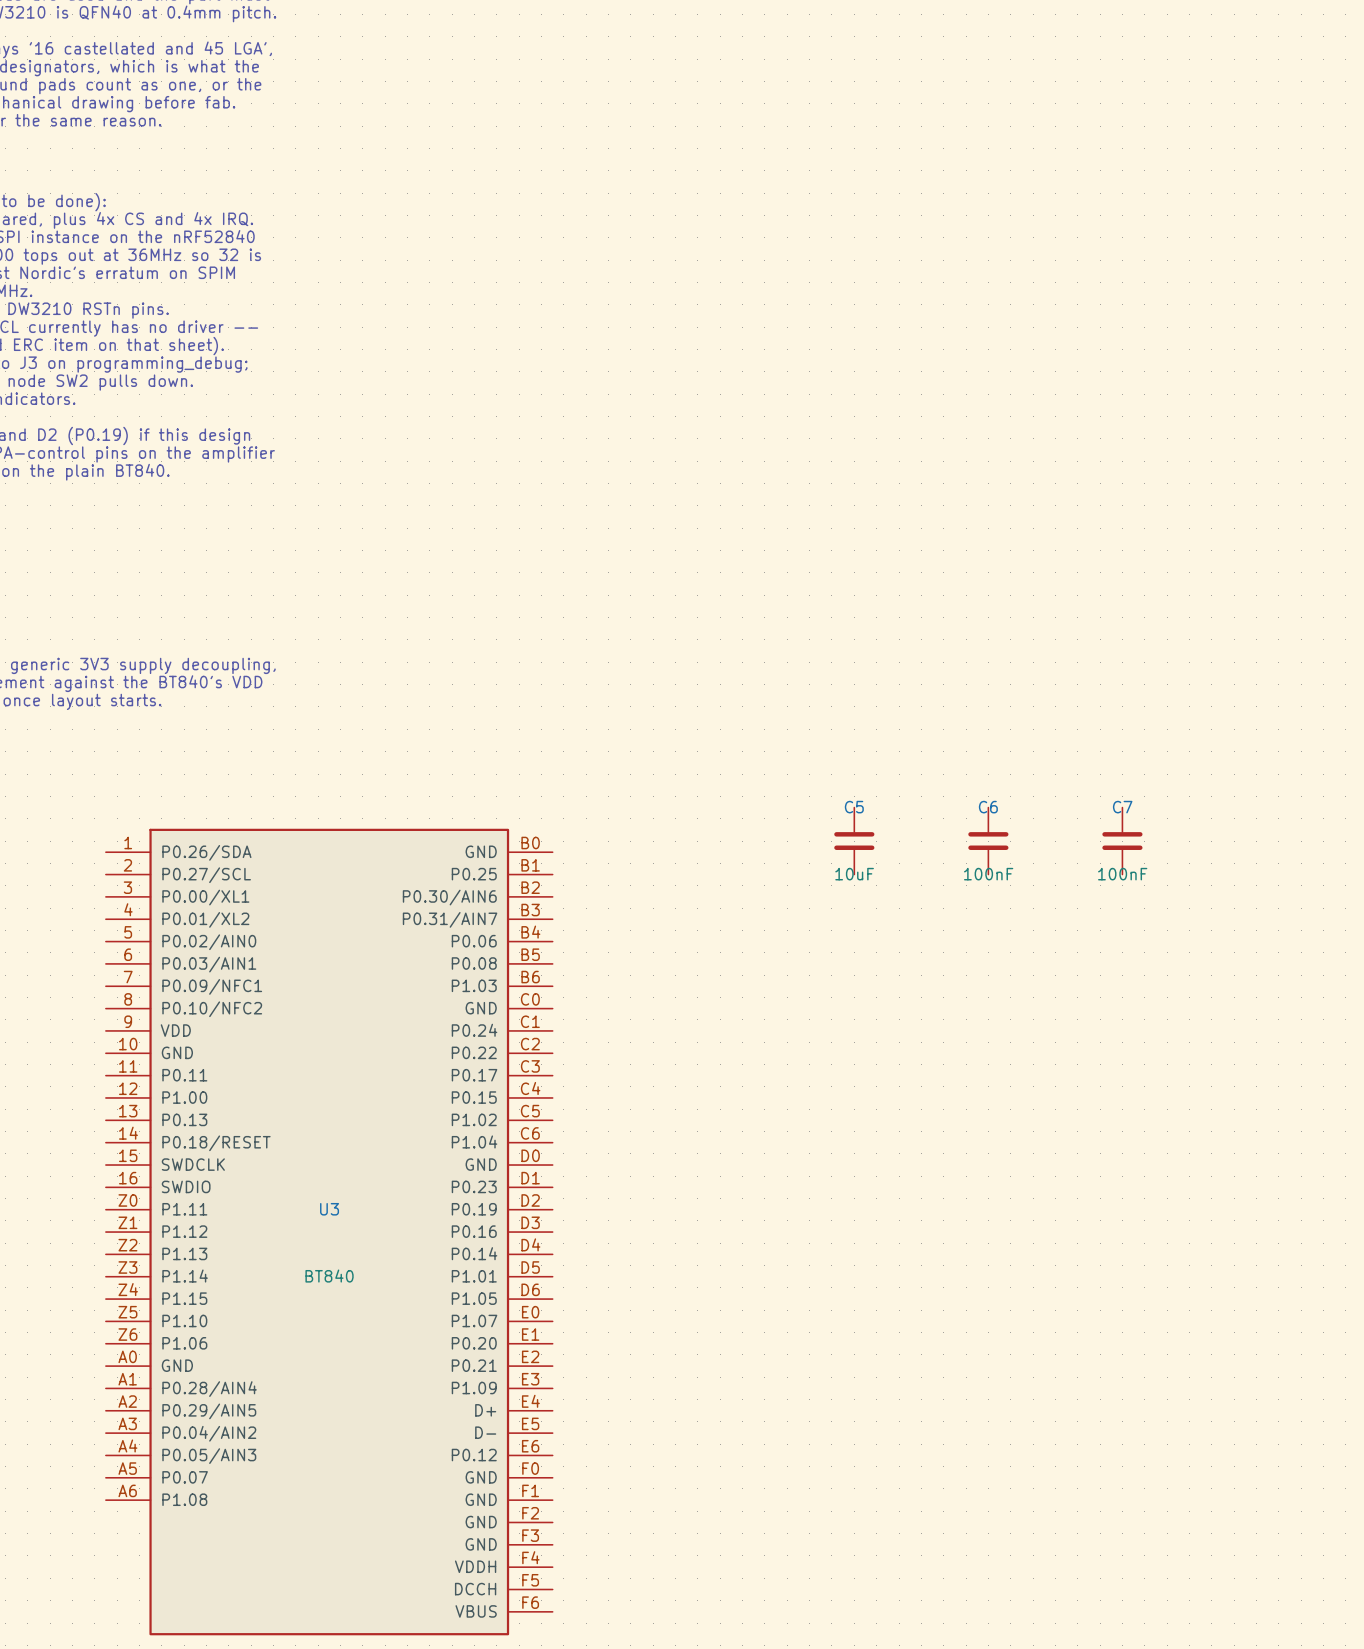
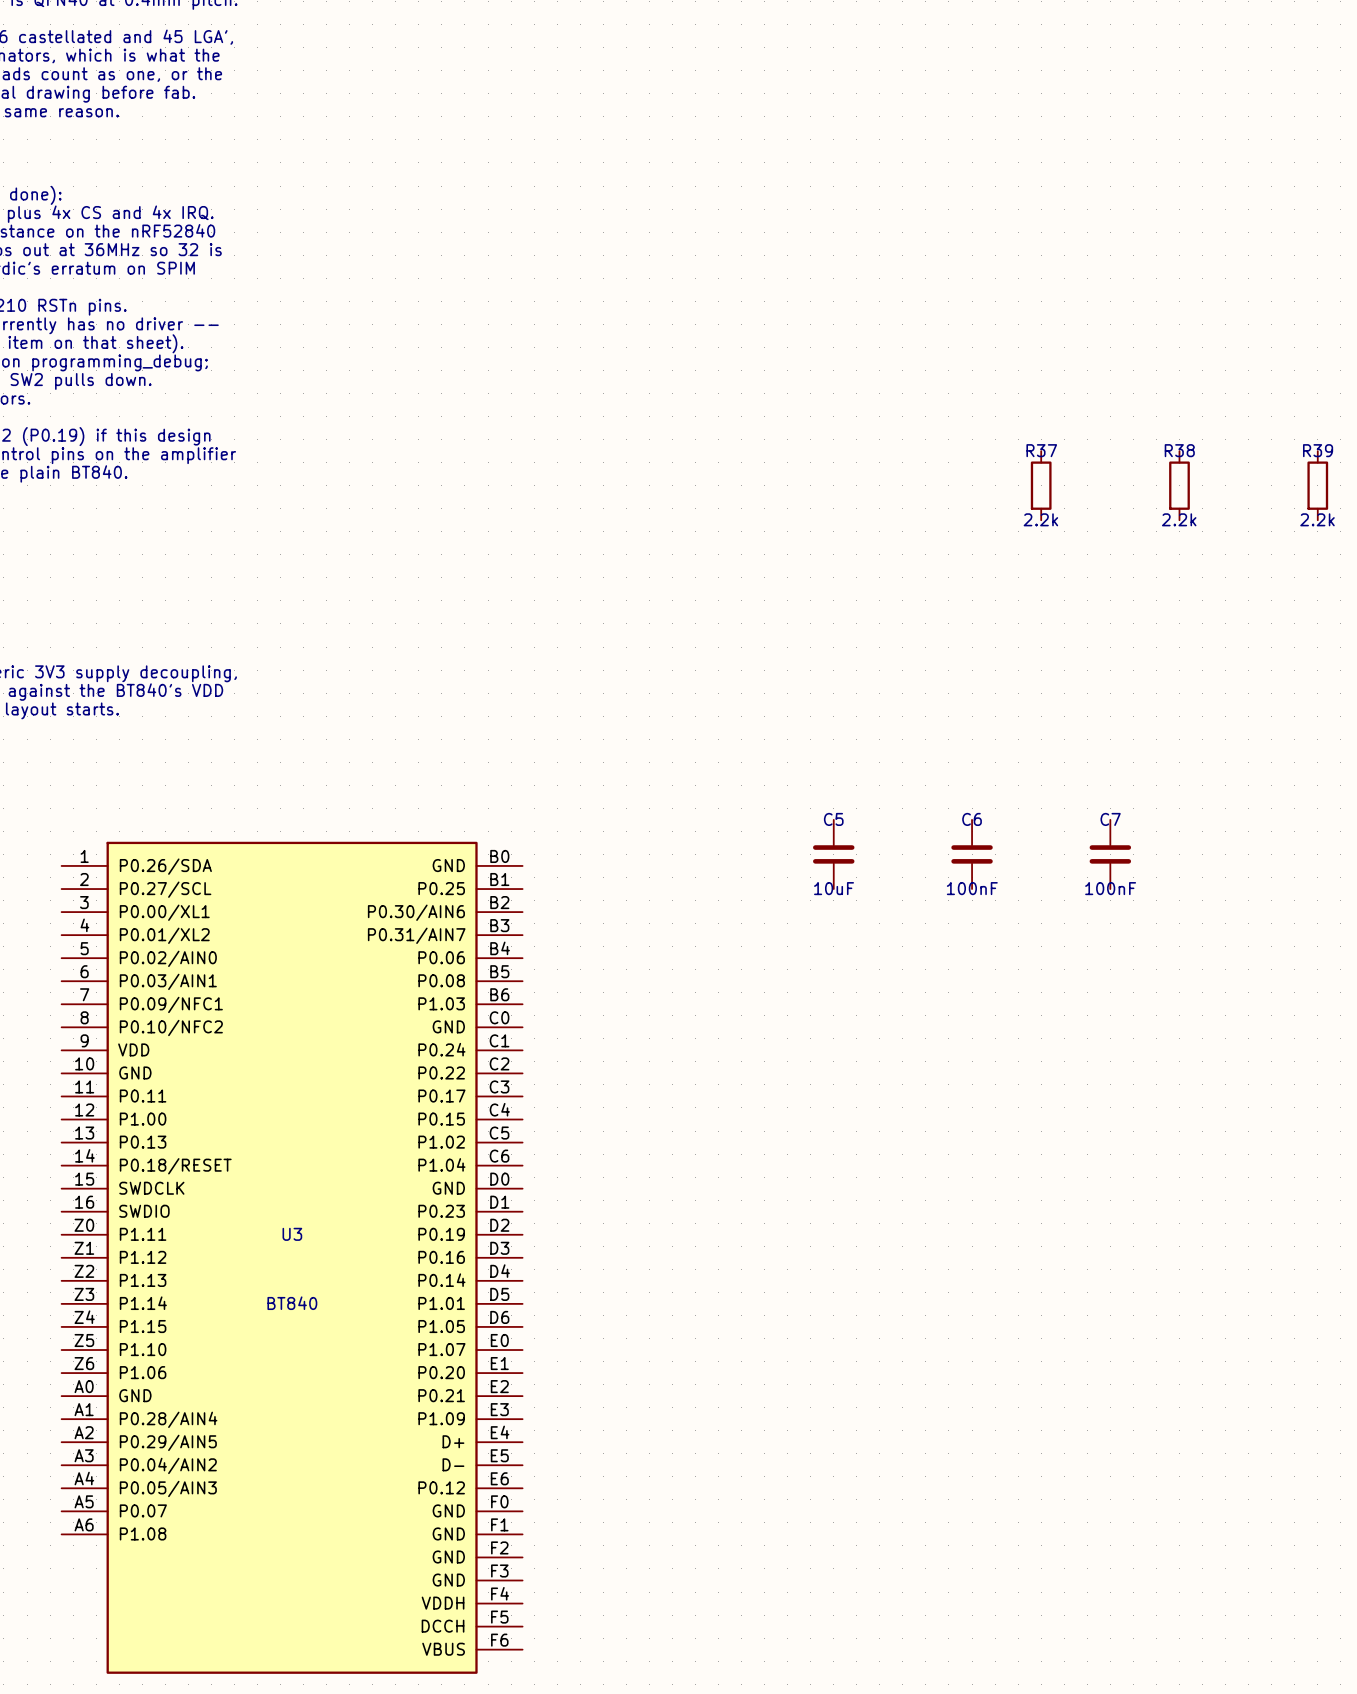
R37: none -> 2.2k (1041, 485)
R38: none -> 2.2k (1179, 485)
R39: none -> 2.2k (1317, 485)

